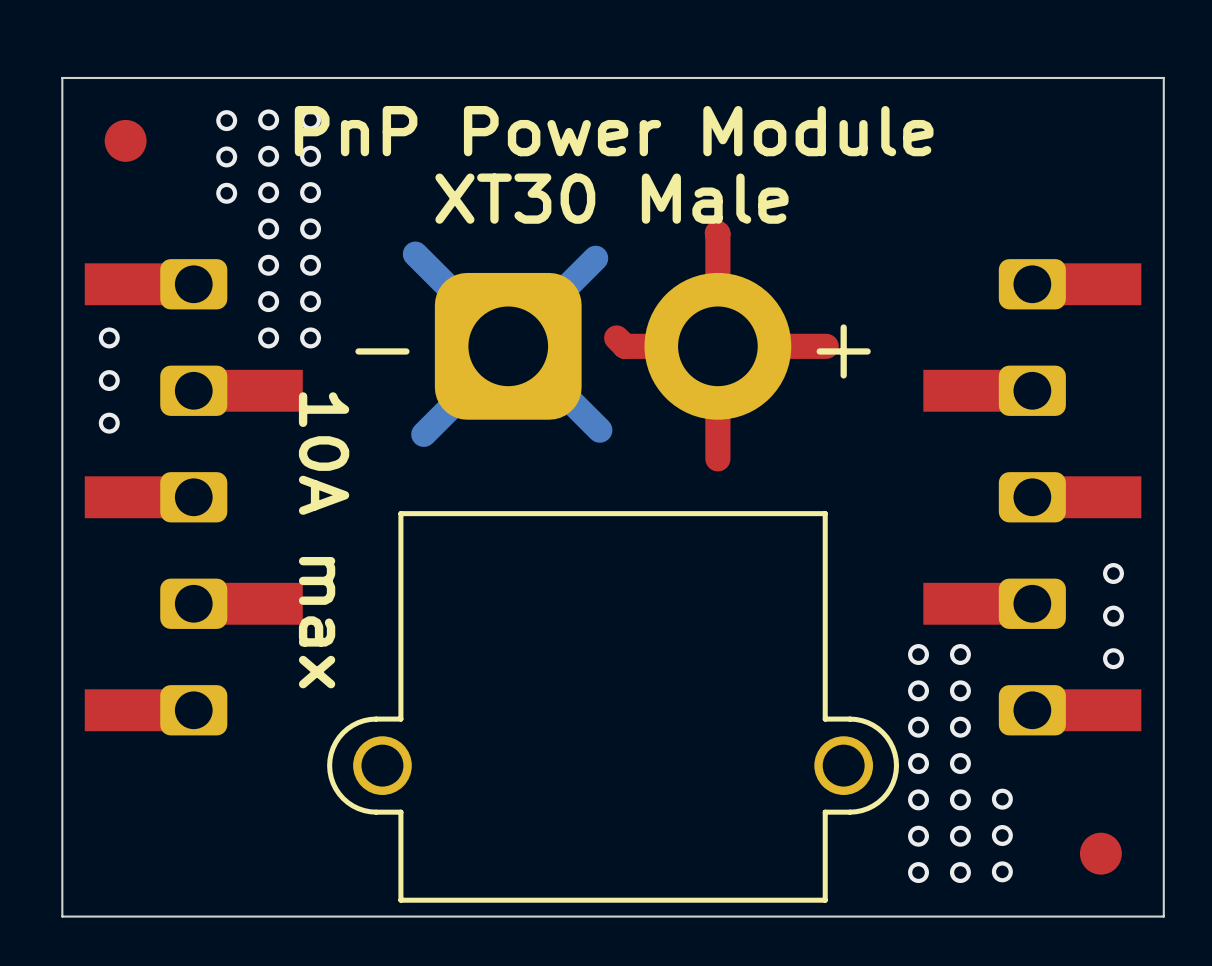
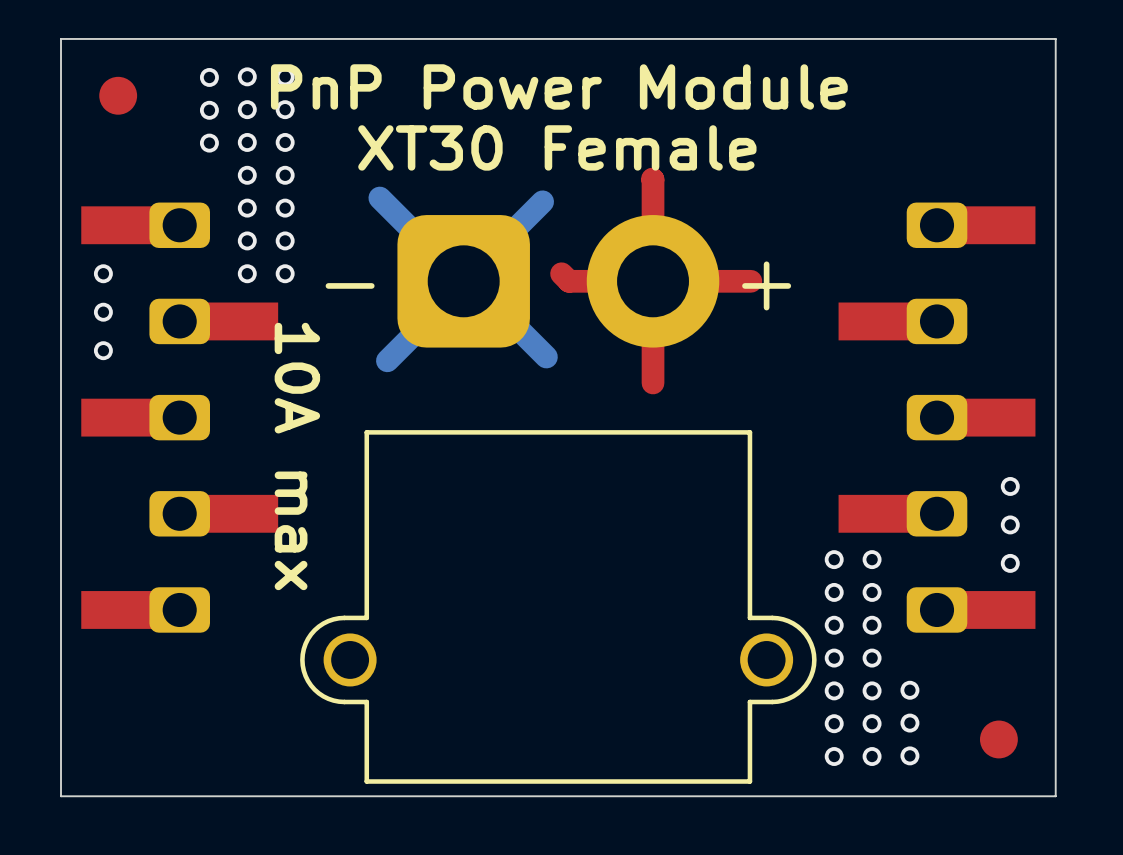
text: XT30 Male (611, 198) -> XT30 Female (557, 147)

